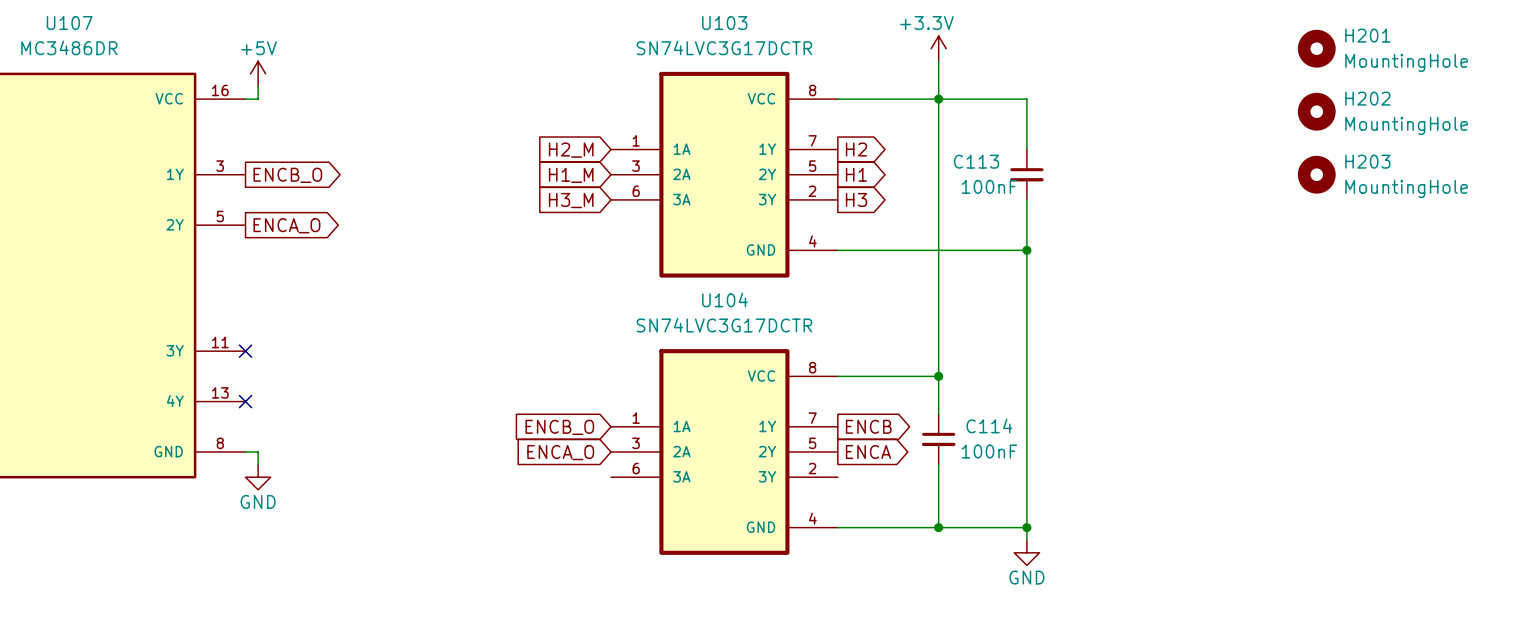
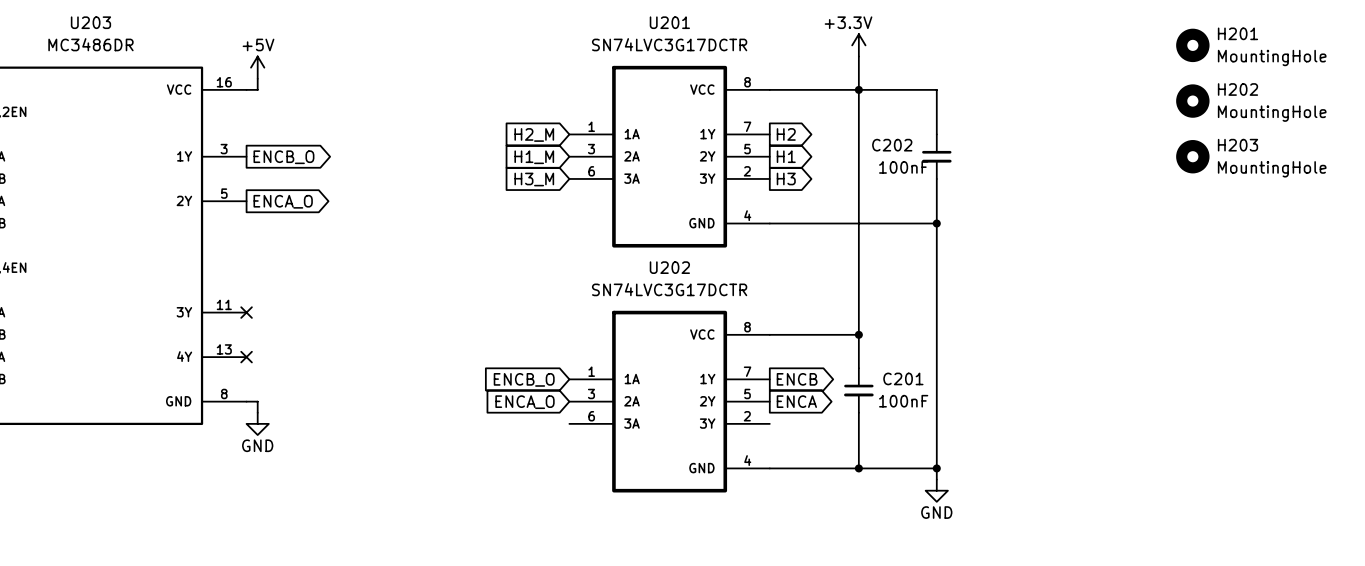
U107 name: U107 (69, 23) -> U203 (90, 22)
U103 name: U103 (724, 23) -> U201 (669, 22)
C113 name: C113 (976, 161) -> C202 (892, 145)
U104 name: U104 (725, 299) -> U202 (669, 267)
C114 name: C114 (989, 426) -> C201 (903, 378)

